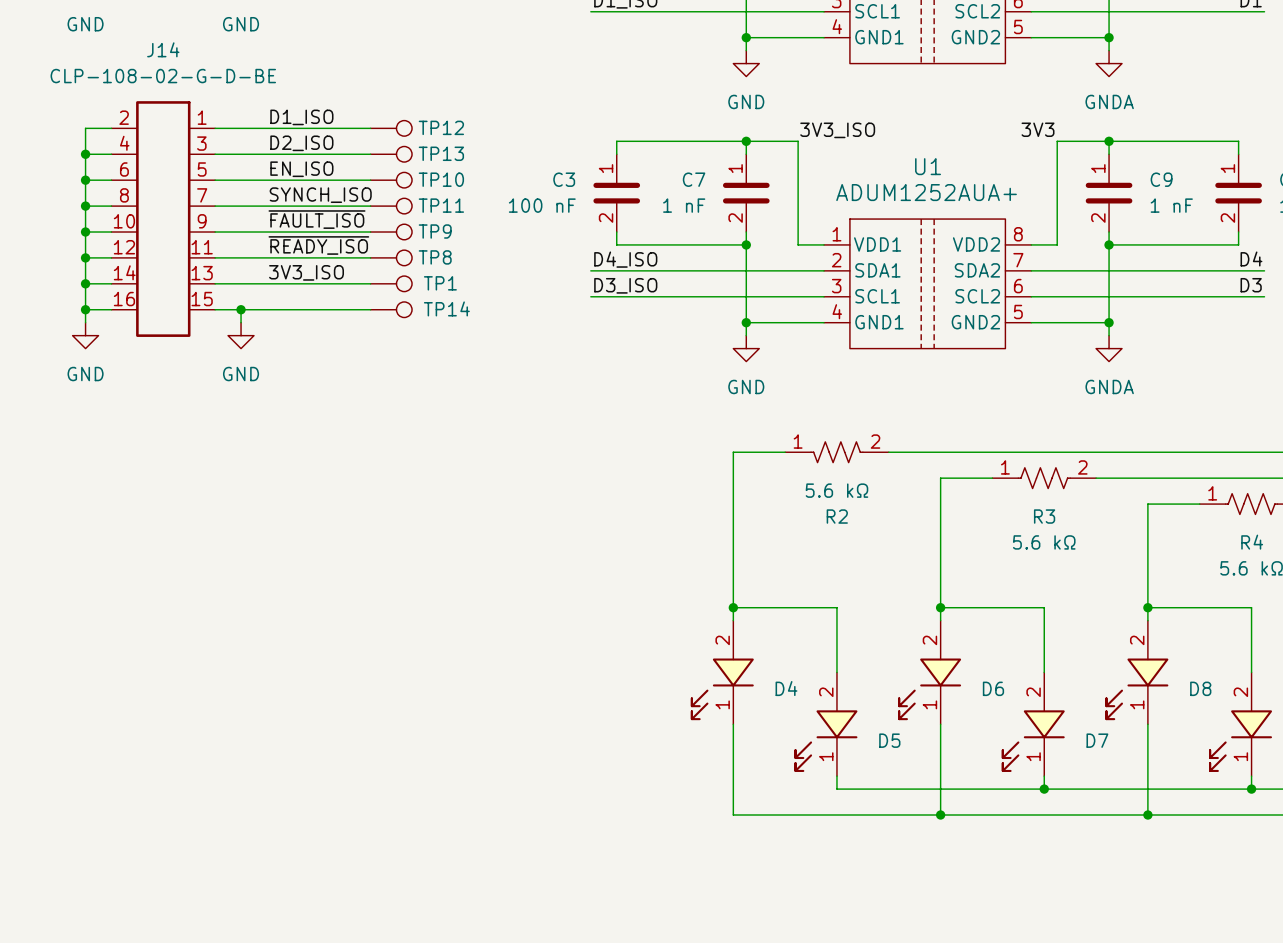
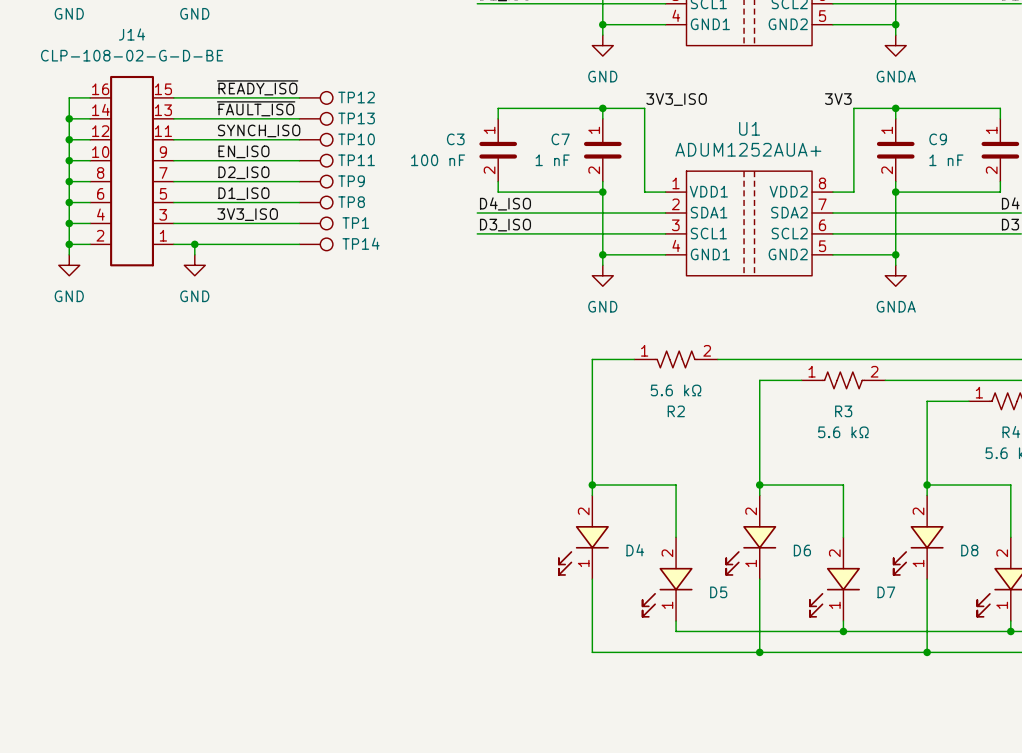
label: D1_ISO (301, 117) -> ~{READY_ISO} (257, 87)
label: D2_ISO (301, 143) -> ~{FAULT_ISO} (256, 108)
label: EN_ISO (301, 169) -> SYNCH_ISO (259, 130)
label: SYNCH_ISO (320, 195) -> EN_ISO (243, 151)
J14 flip: as is (163, 219) -> up-down (132, 171)
label: ~{FAULT_ISO} (317, 219) -> D2_ISO (243, 172)
label: ~{READY_ISO} (318, 245) -> D1_ISO (243, 193)

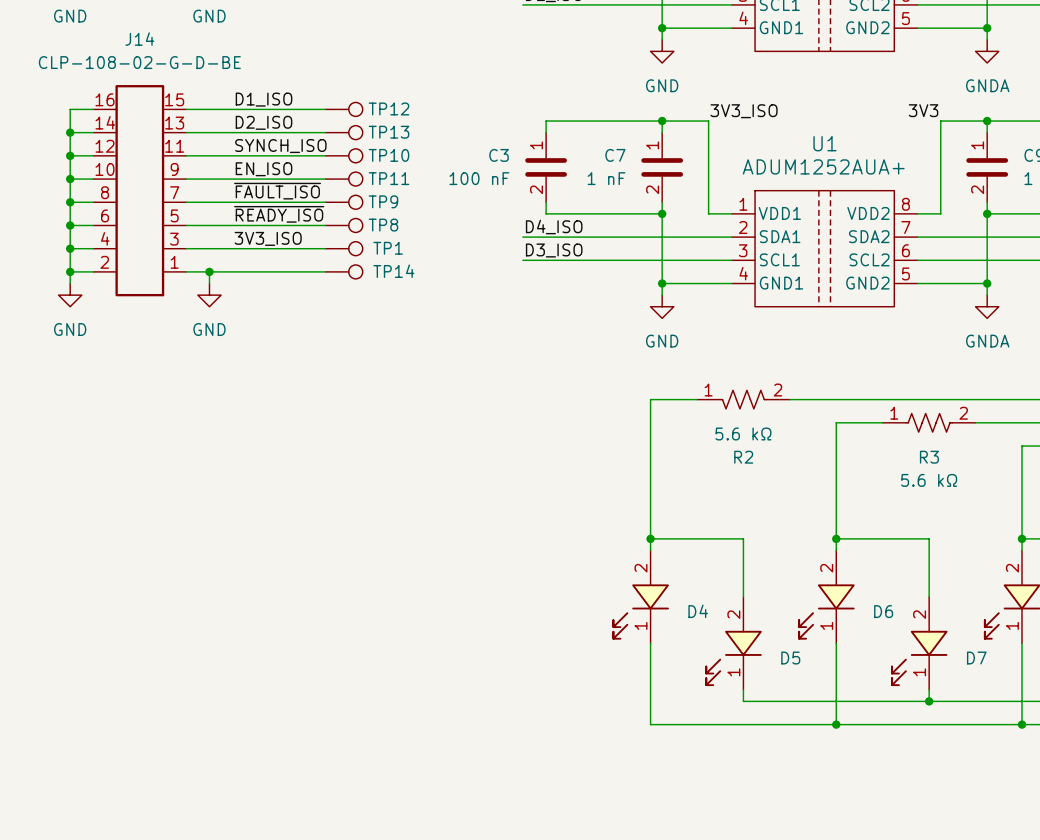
label: ~{READY_ISO} (257, 87) -> D1_ISO (264, 99)
label: ~{FAULT_ISO} (256, 108) -> D2_ISO (264, 122)
label: D2_ISO (243, 172) -> ~{FAULT_ISO} (277, 191)
label: D1_ISO (243, 193) -> ~{READY_ISO} (279, 214)

